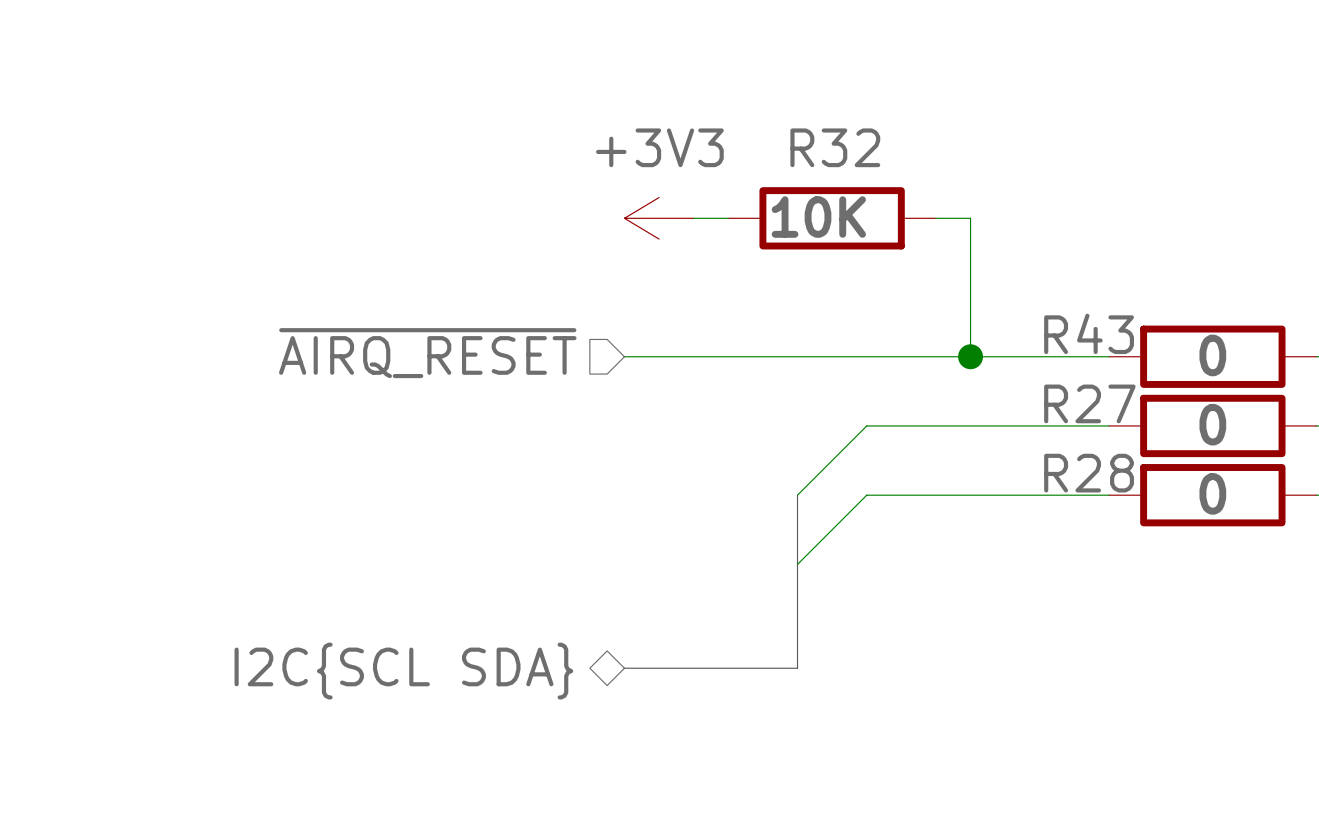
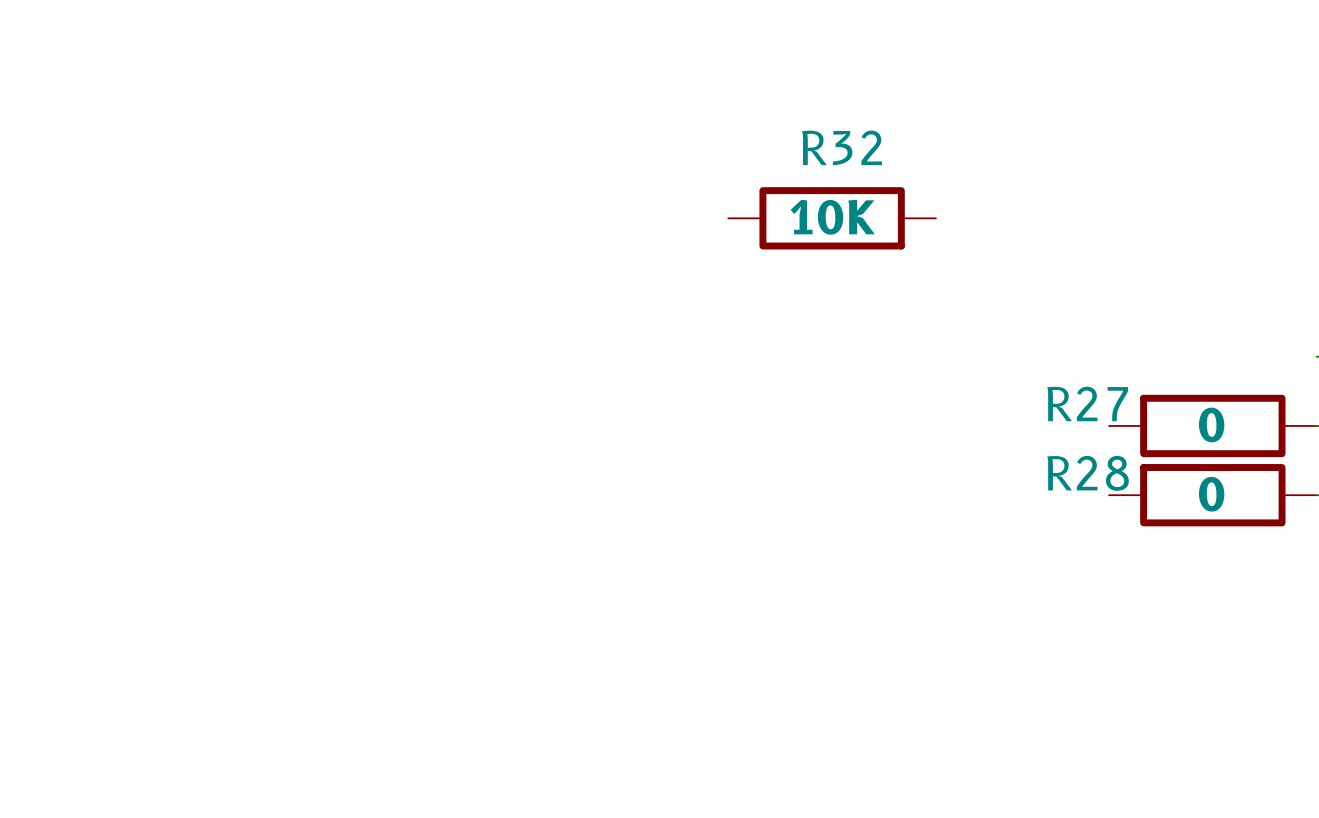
power symbol: +3V3 (659, 218) -> none
wire: (693, 218) (728, 218) -> none
wire: (935, 218) (970, 218) (970, 356) -> none
hierarchical label: ~{AIRQ_RESET} (427, 353) -> none
wire: (624, 356) (1109, 356) -> none
junction: (970, 356) -> none
R43: 0 (1212, 356) -> none
wire: (1109, 425) (866, 425) (797, 495) -> none
bus: (797, 495) (797, 668) (624, 668) -> none
wire: (1109, 495) (866, 495) (797, 564) -> none
hierarchical label: I2C{SCL SDA} (403, 671) -> none

